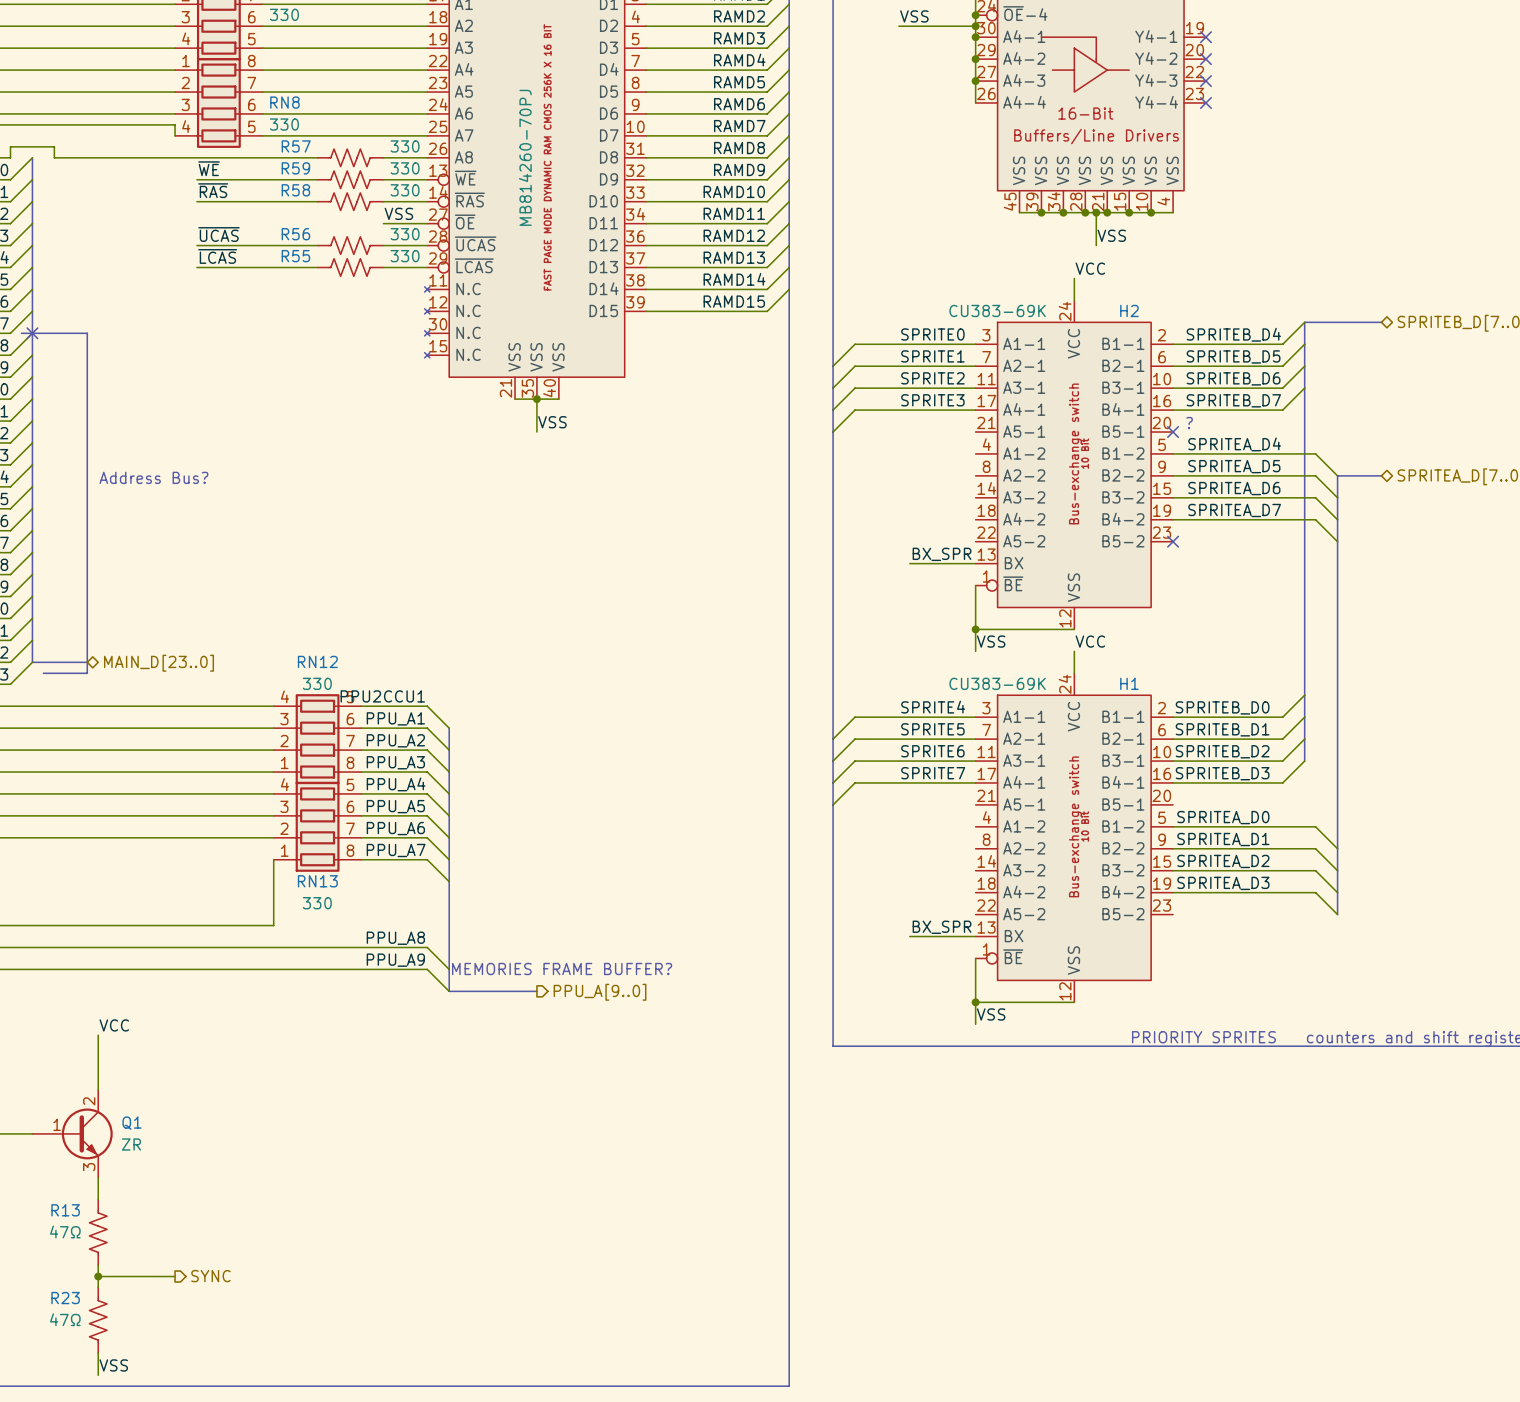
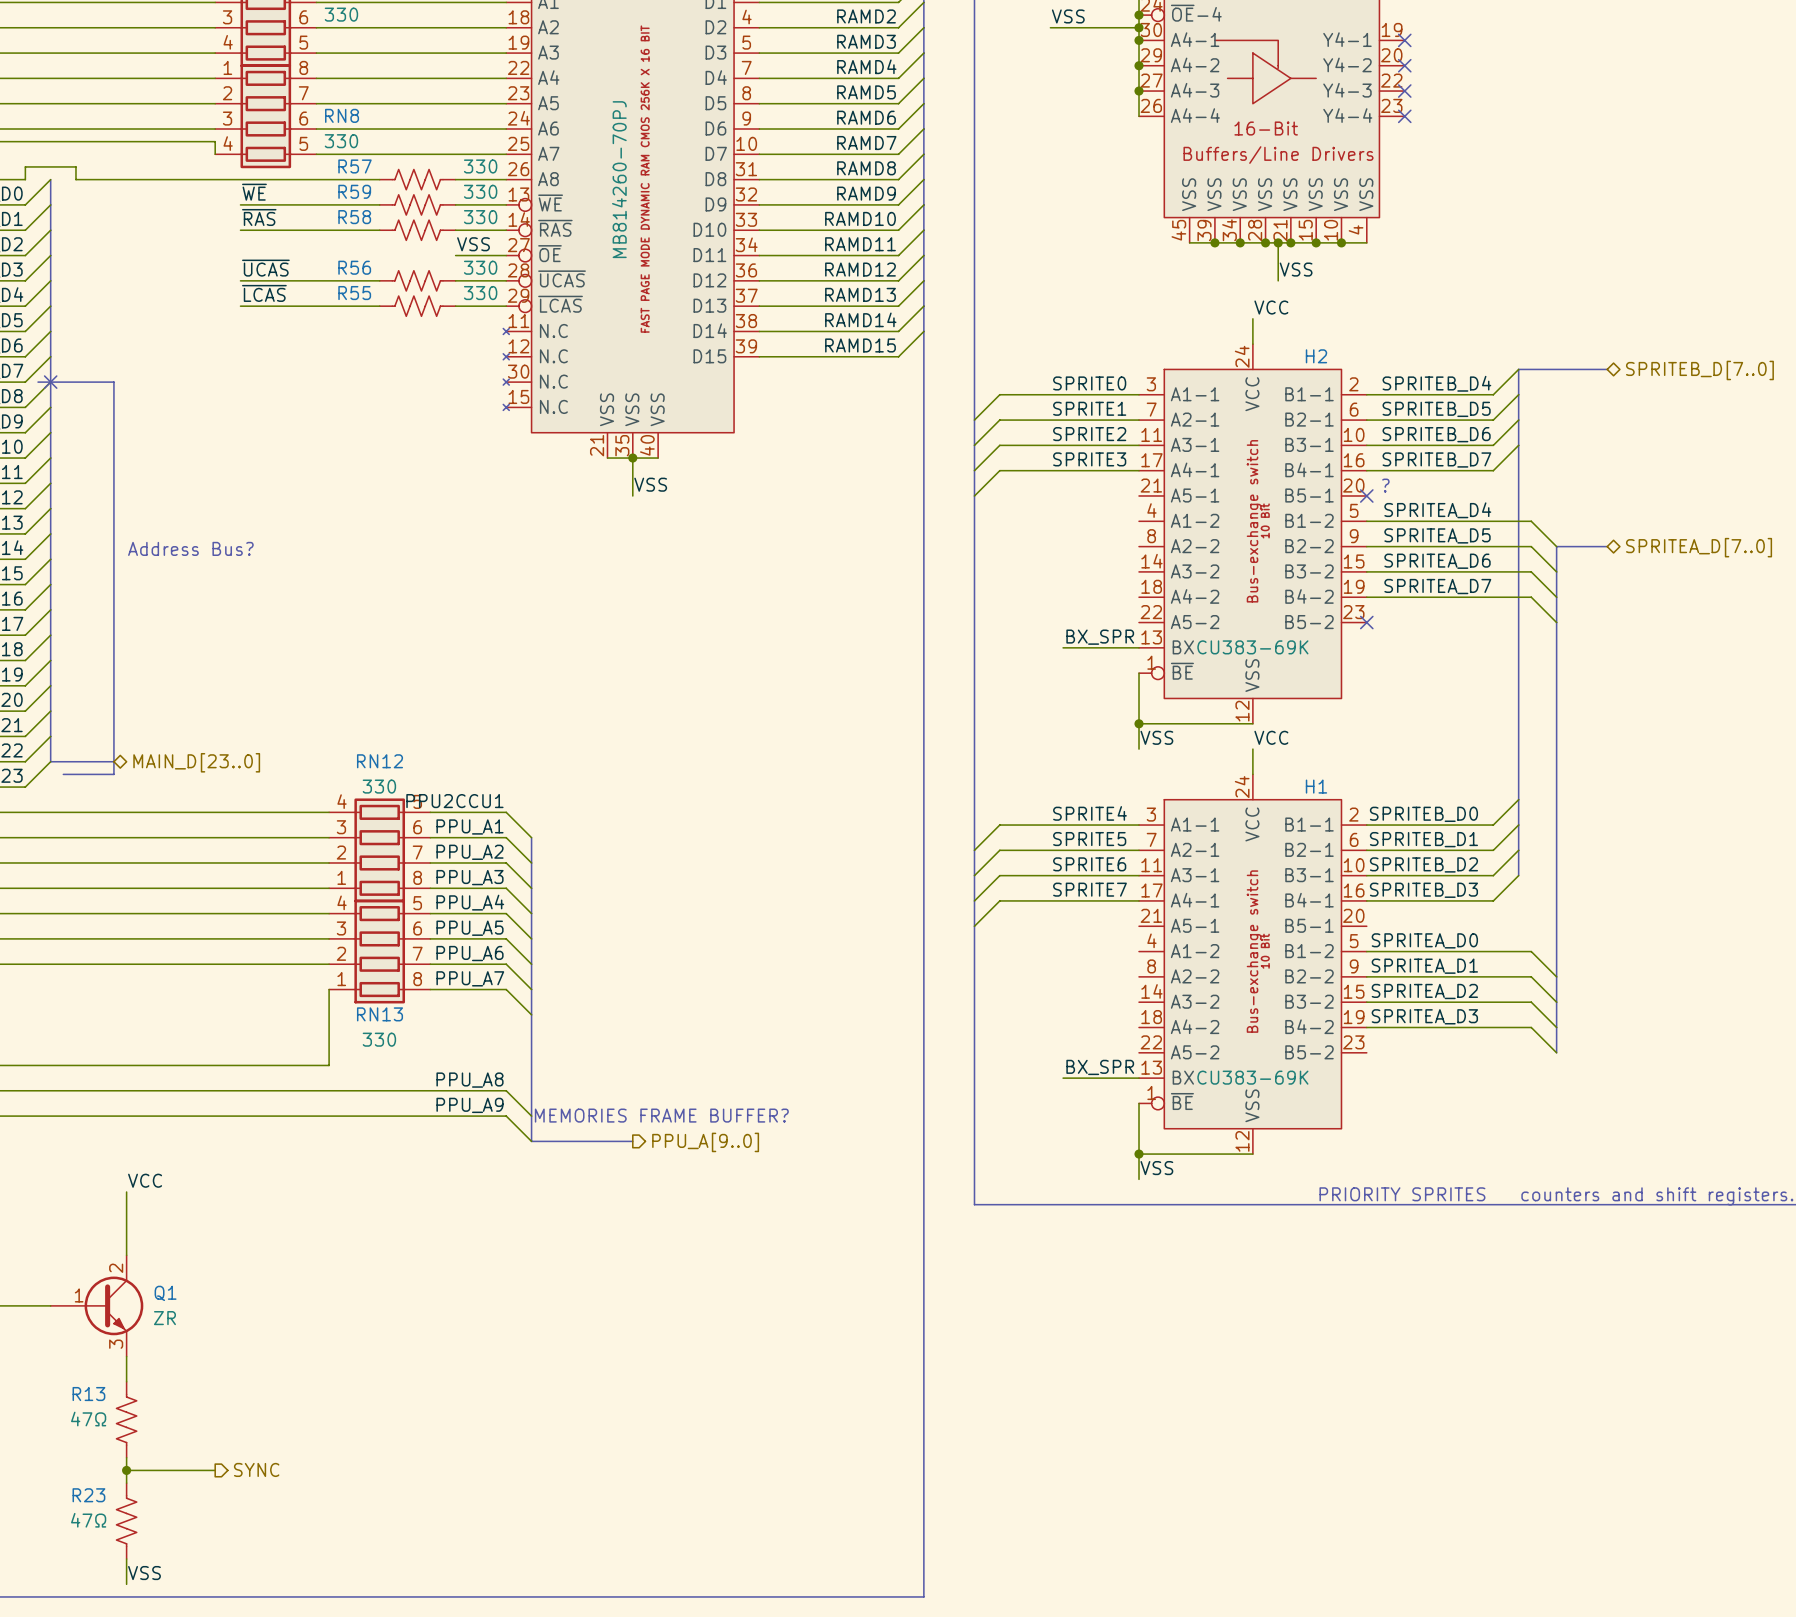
H2 value position: CU383-69K (997, 310) -> CU383-69K (1252, 647)
H1 value position: CU383-69K (997, 683) -> CU383-69K (1252, 1077)

